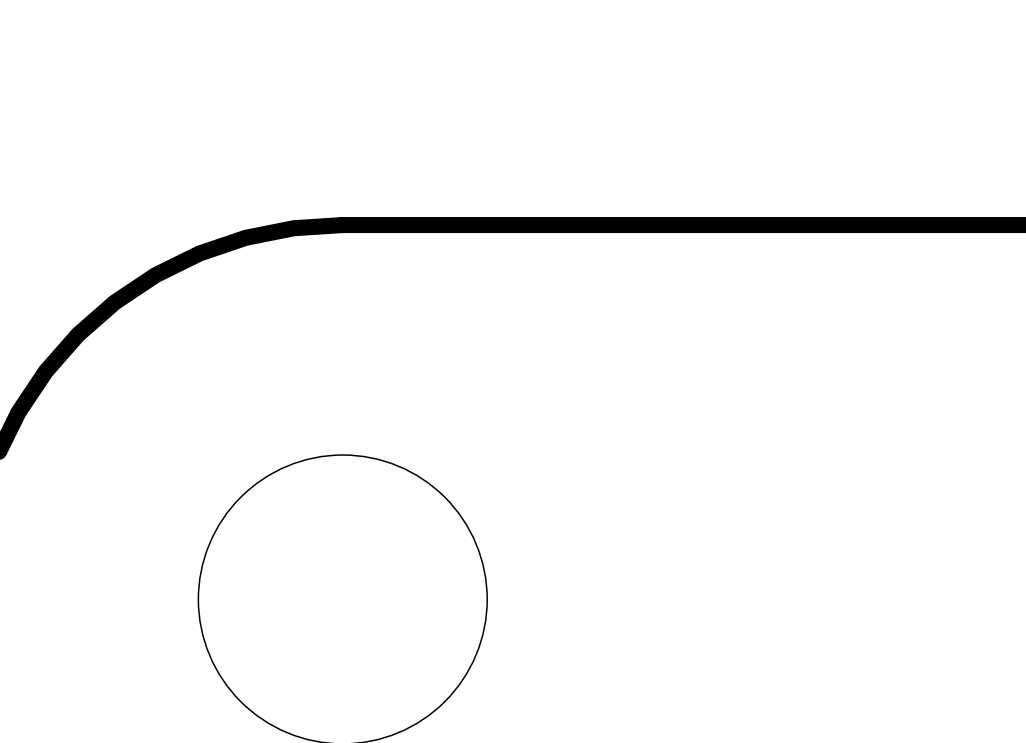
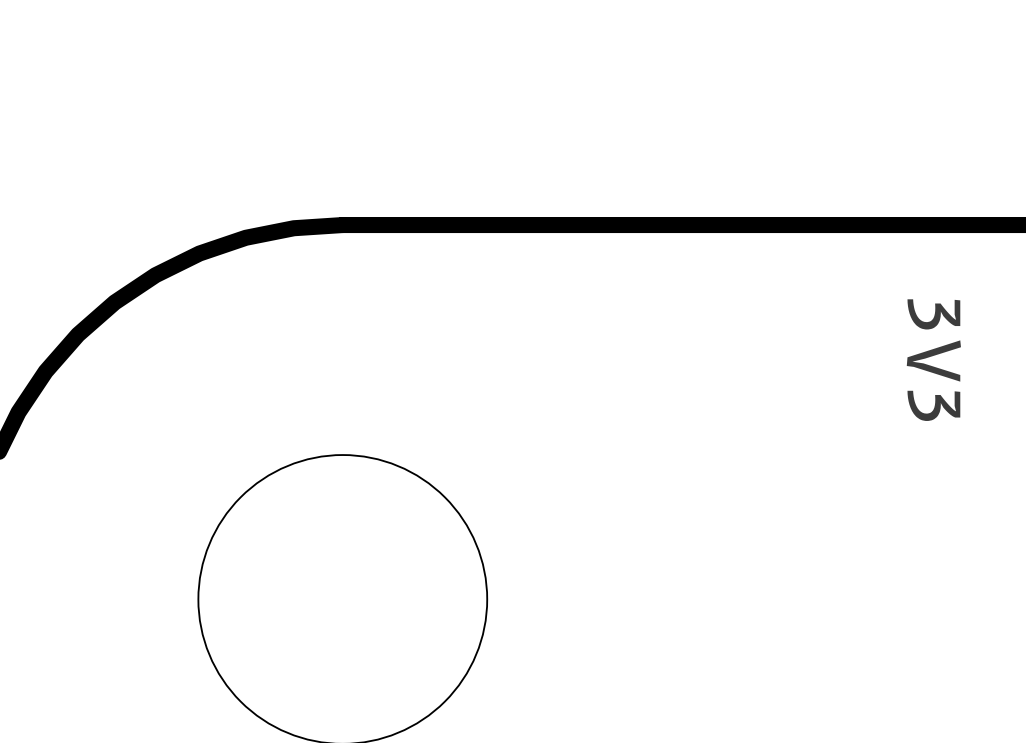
text: none -> 3V3 (933, 360)

